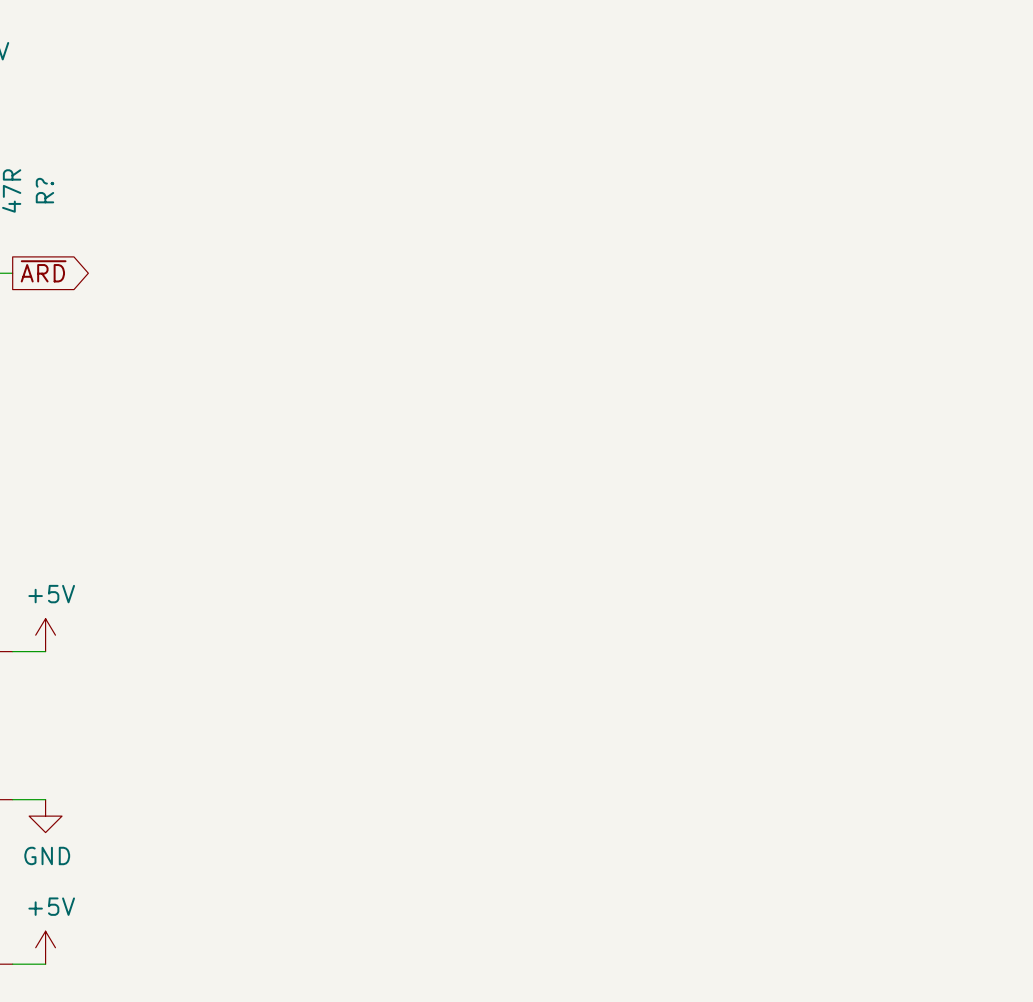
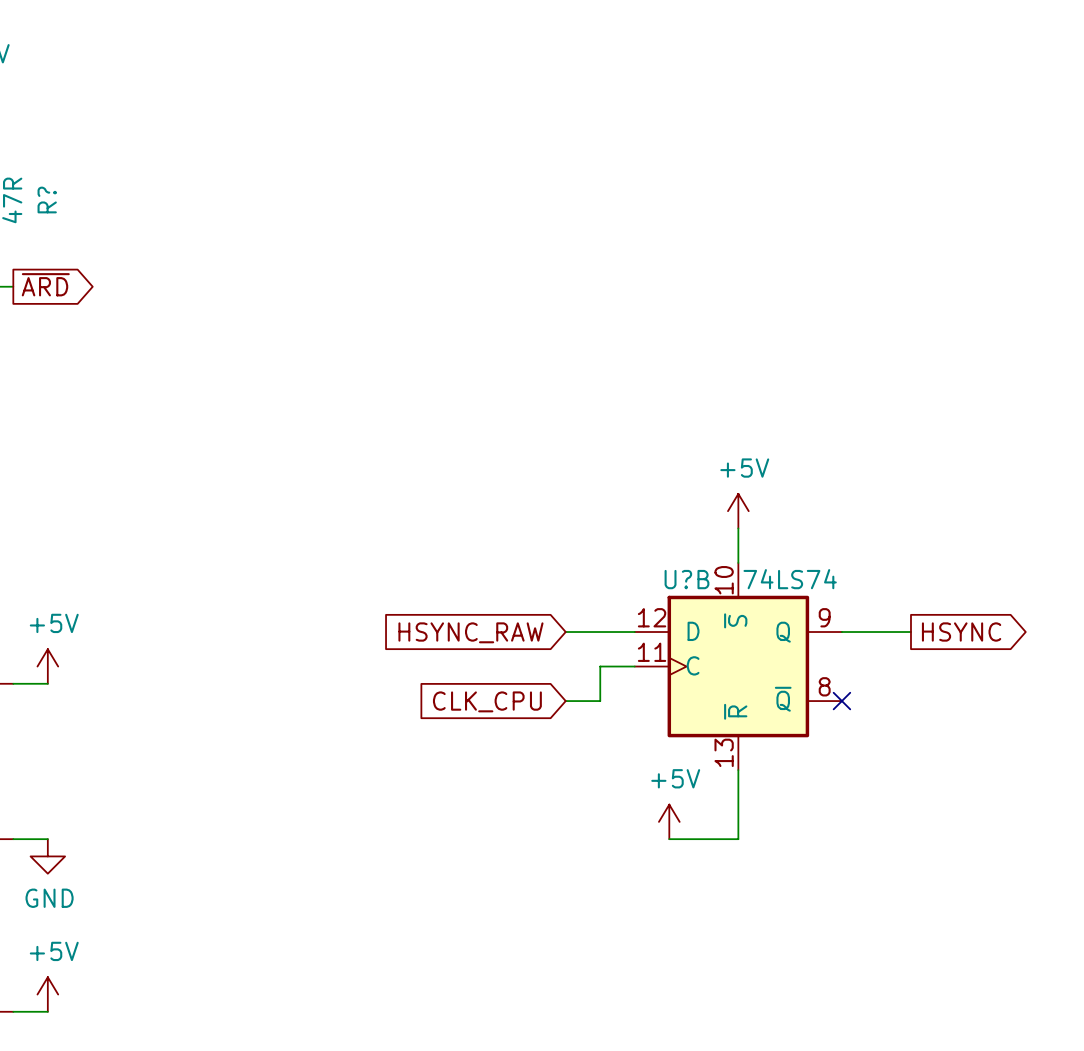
power symbol: none -> +5V (738, 511)
wire: none -> (738, 528) (738, 562)
wire: none -> (565, 632) (634, 632)
wire: none -> (841, 632) (910, 632)
global label: none -> HSYNC (961, 632)
global label: none -> HSYNC_RAW (470, 632)
wire: none -> (634, 666) (600, 666) (600, 701) (565, 701)
U?B: none -> 74LS74 (738, 666)
global label: none -> CLK_CPU (487, 701)
no-connect mark: none -> (841, 701)
wire: none -> (738, 770) (738, 839) (669, 839)
power symbol: none -> +5V (669, 821)

